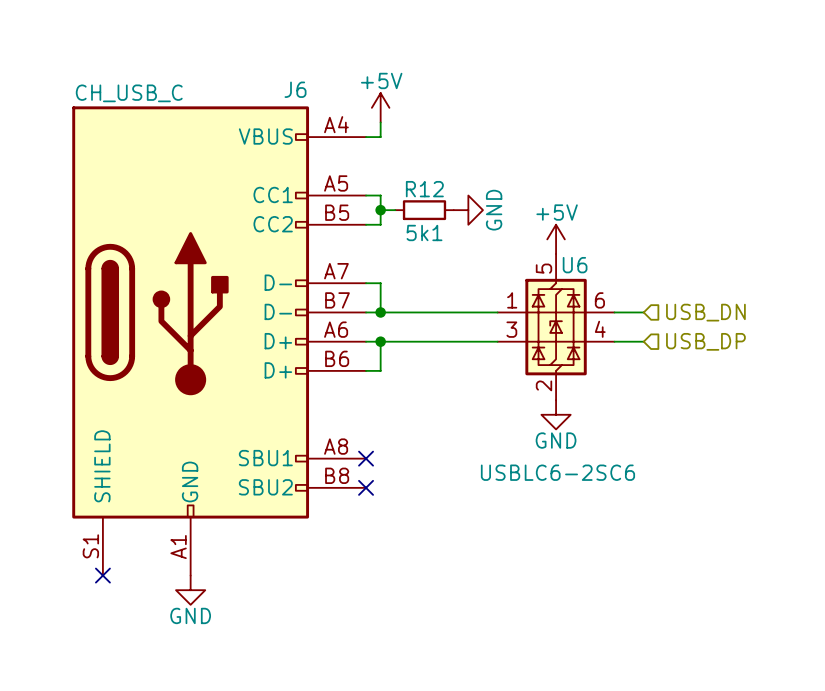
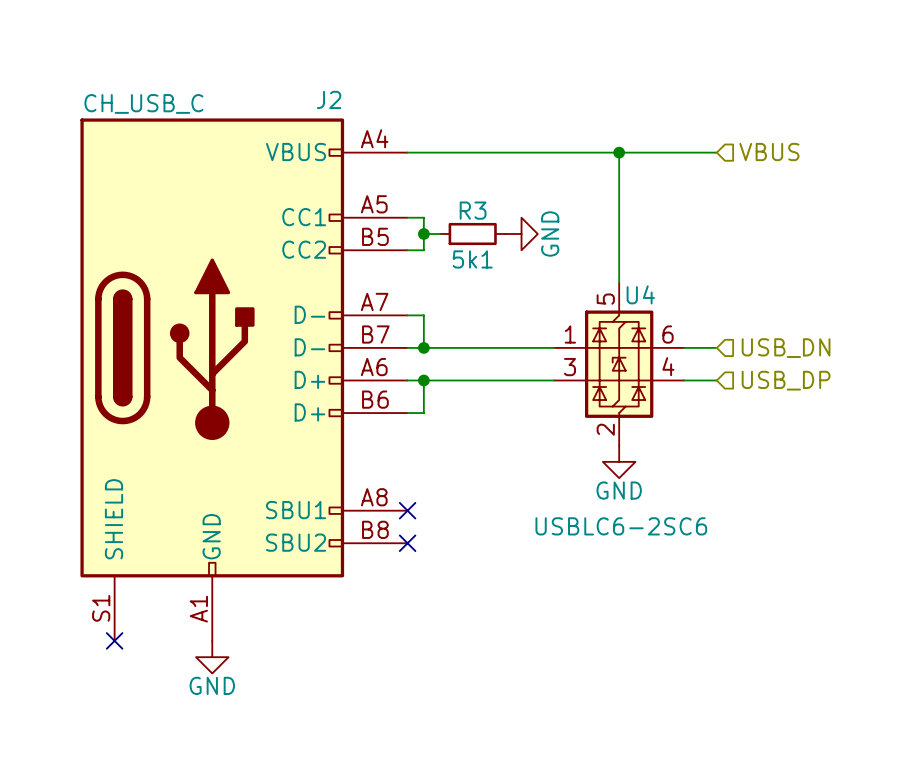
J6 name: J6 (295, 89) -> J2 (329, 99)
power symbol: +5V (380, 107) -> none
wire: (380, 122) (380, 137) -> (716, 152) (423, 152)
hierarchical label: none -> VBUS (769, 152)
wire: none -> (619, 152) (619, 282)
junction: none -> (619, 152)
R12 name: R12 (424, 189) -> R3 (473, 210)
power symbol: +5V (556, 239) -> none
U6 name: U6 (575, 265) -> U4 (640, 294)

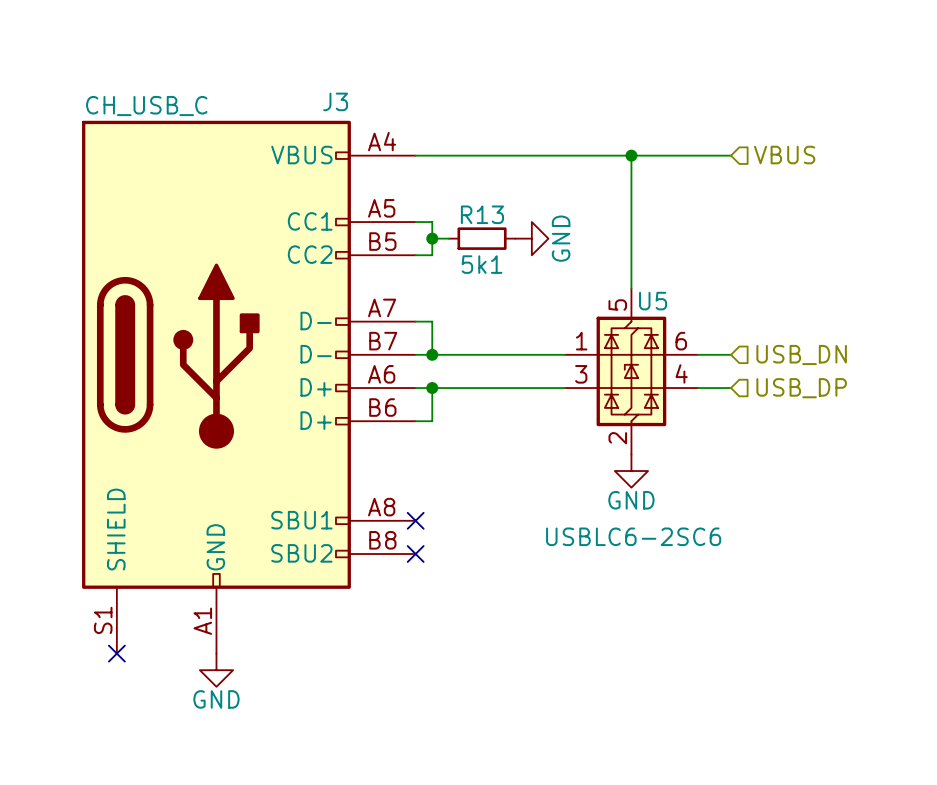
J2 name: J2 (329, 99) -> J3 (335, 101)
R3 name: R3 (473, 210) -> R13 (482, 214)
U4 name: U4 (640, 294) -> U5 (653, 301)

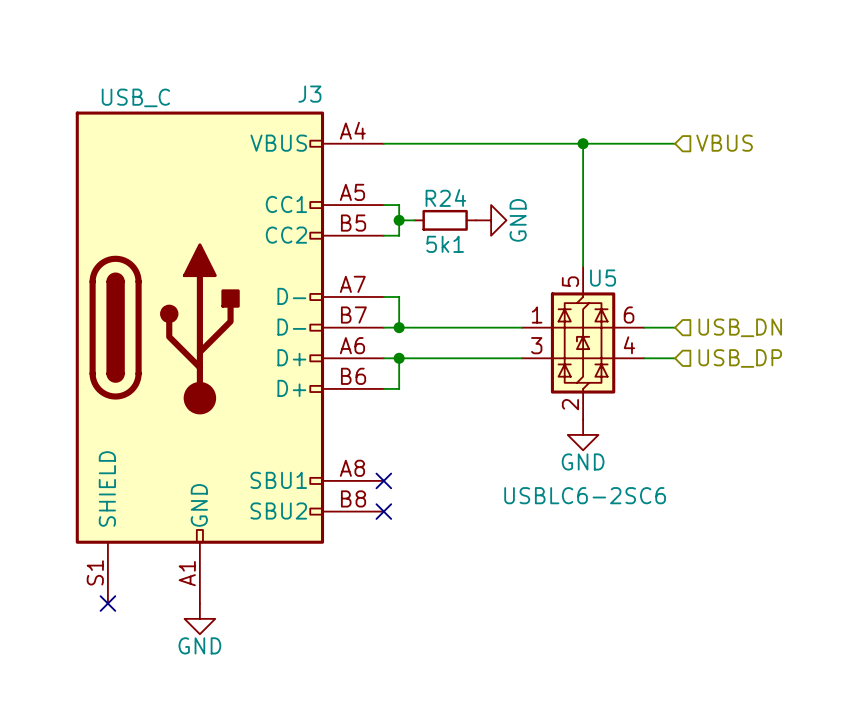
J3 value: CH_USB_C (146, 106) -> USB_C (135, 97)
R13 name: R13 (482, 214) -> R24 (445, 197)

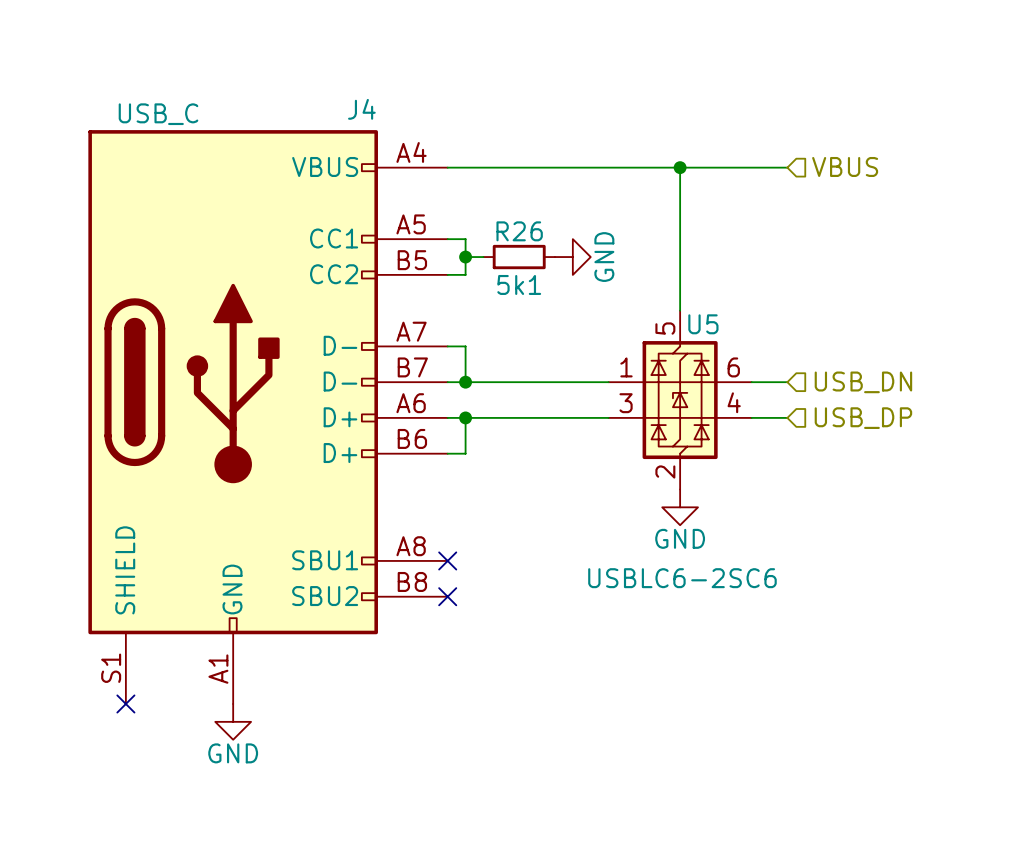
J3 name: J3 (309, 94) -> J4 (361, 109)
R24 name: R24 (445, 197) -> R26 (519, 231)

